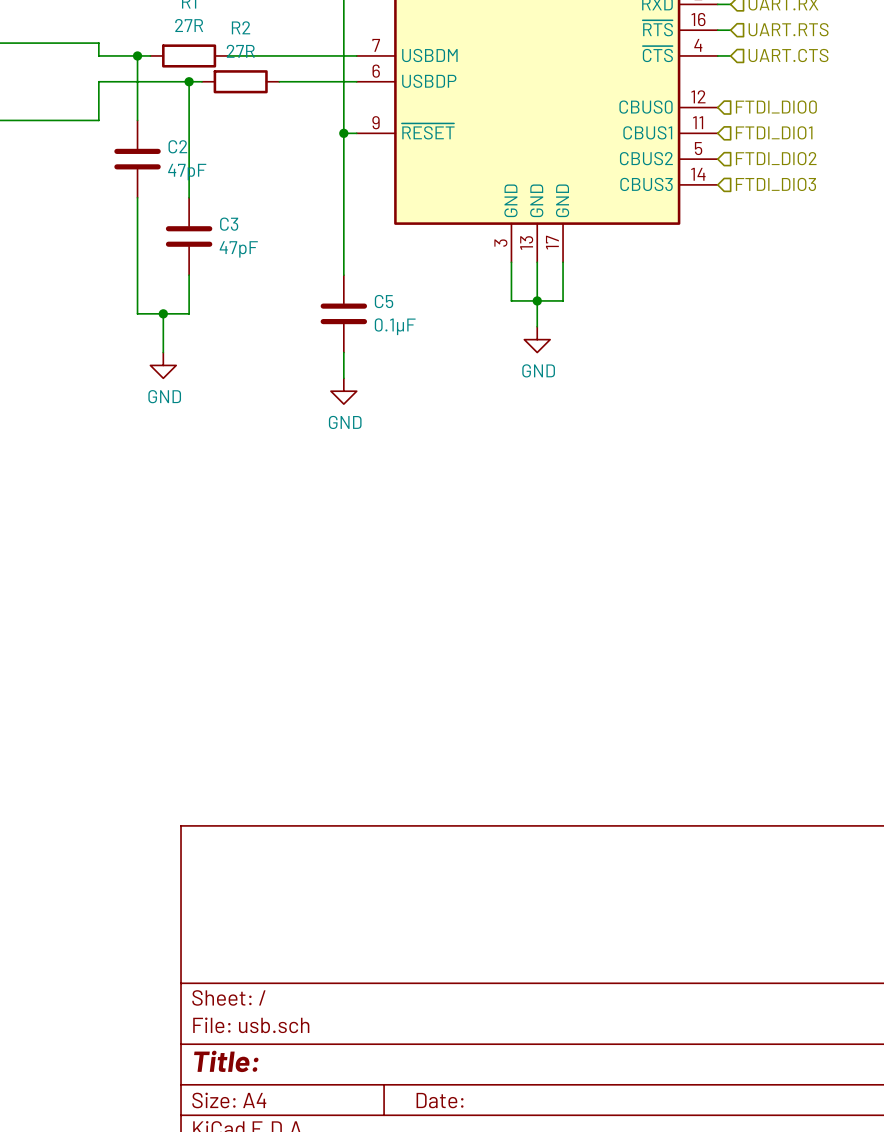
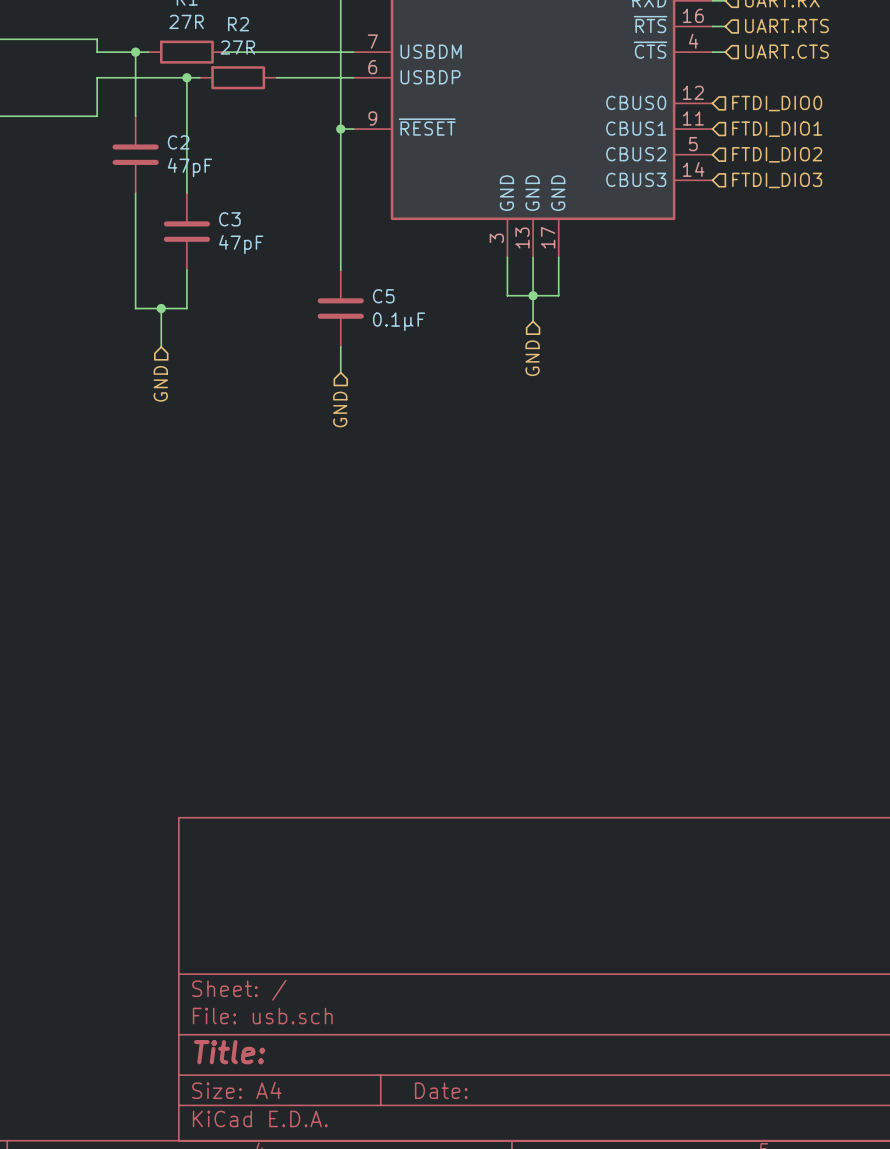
power symbol: GND (537, 339) -> none
hierarchical label: none -> GND (532, 358)
power symbol: GND (163, 365) -> none
hierarchical label: none -> GND (160, 383)
power symbol: GND (343, 391) -> none
hierarchical label: none -> GND (340, 409)

